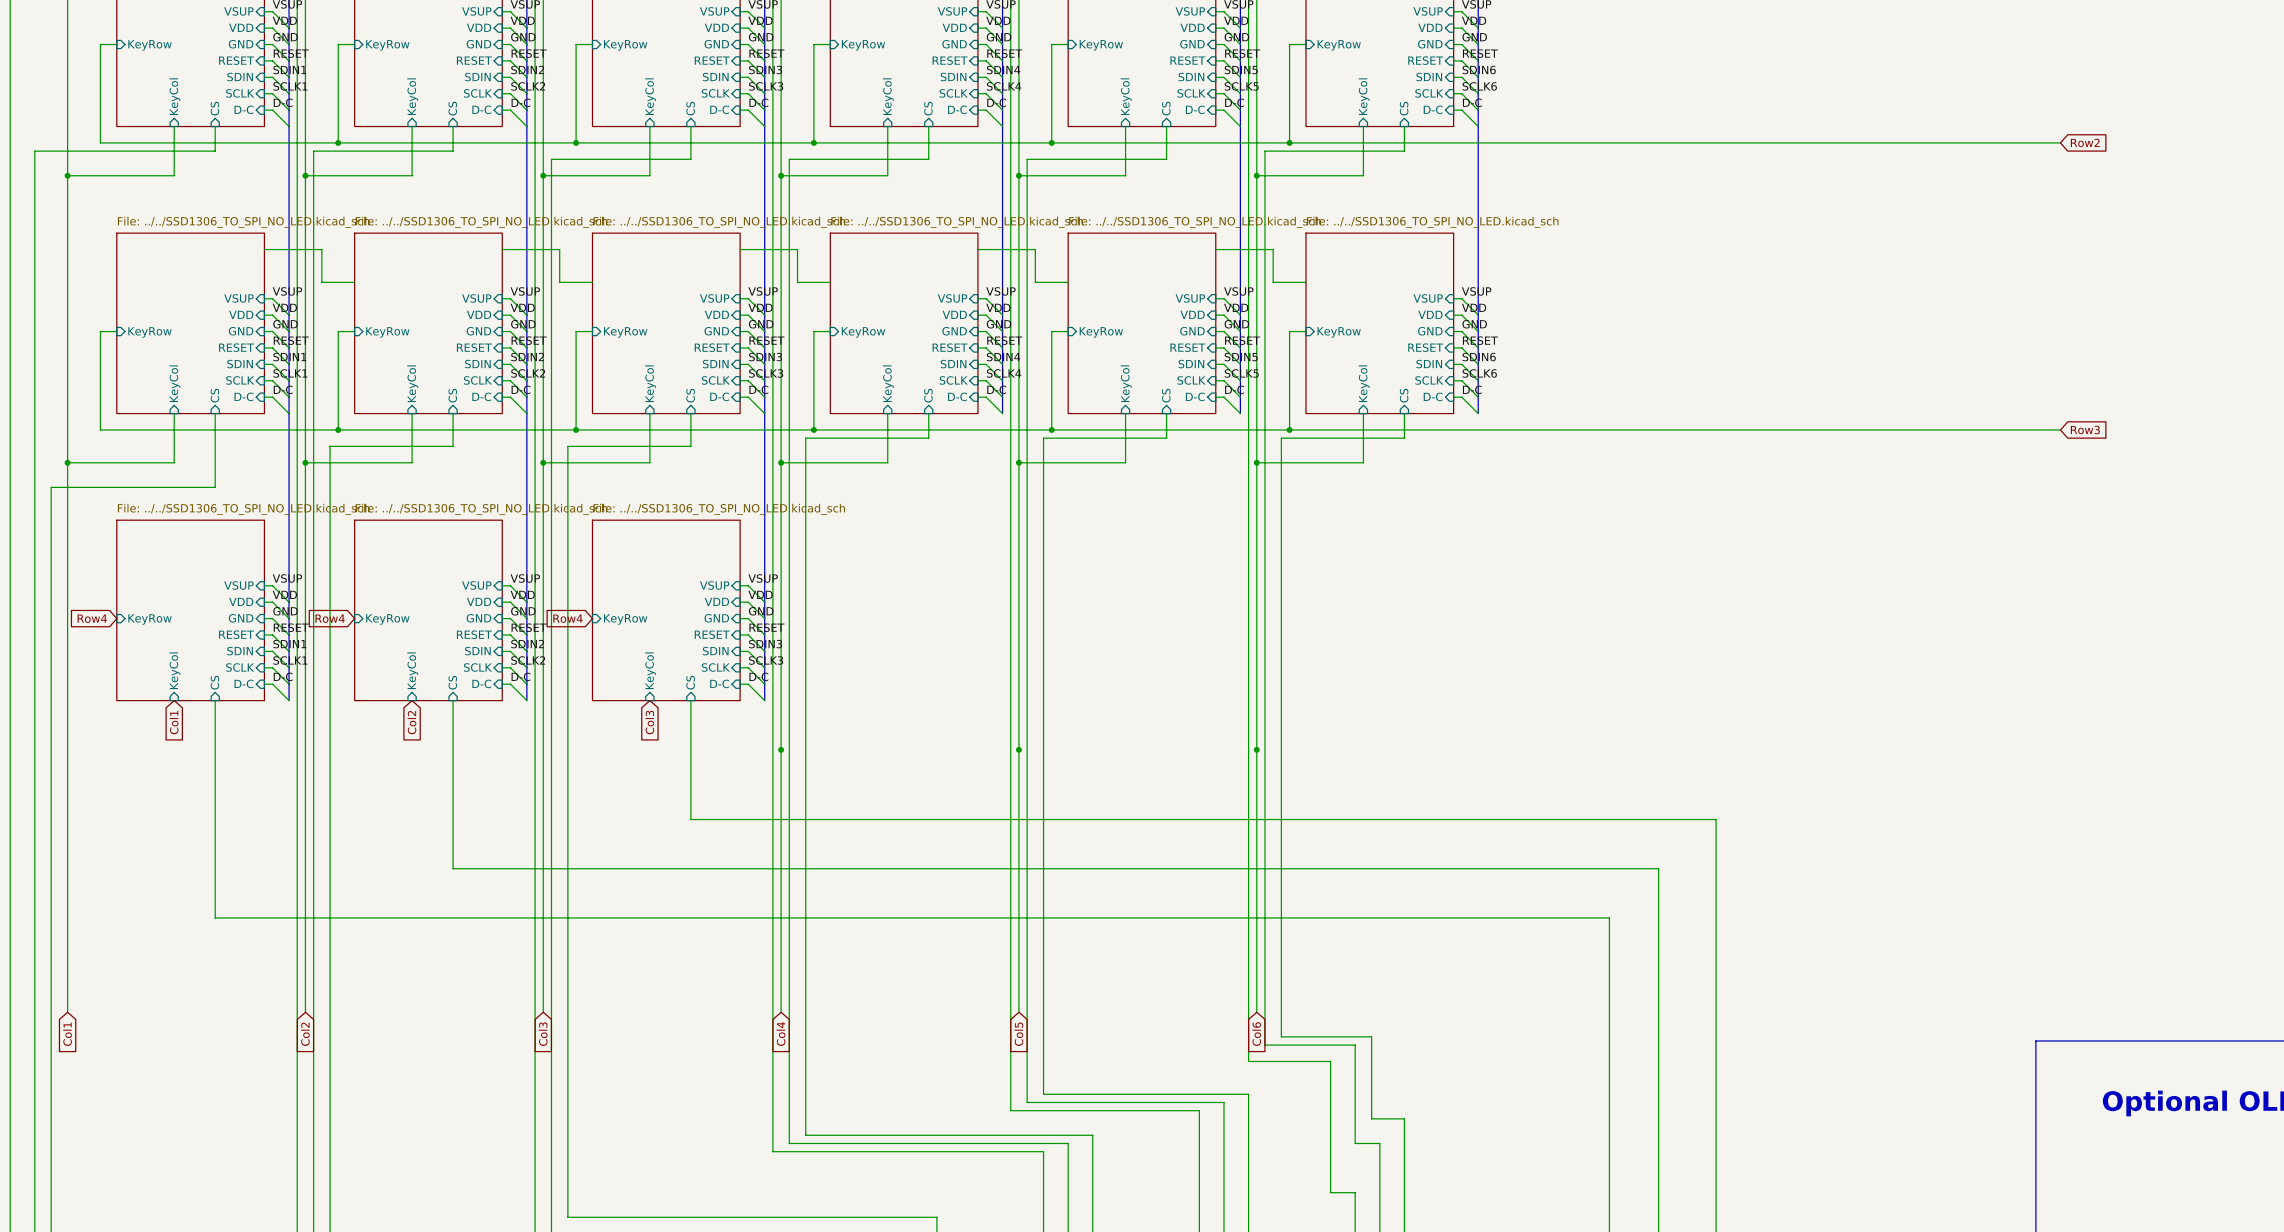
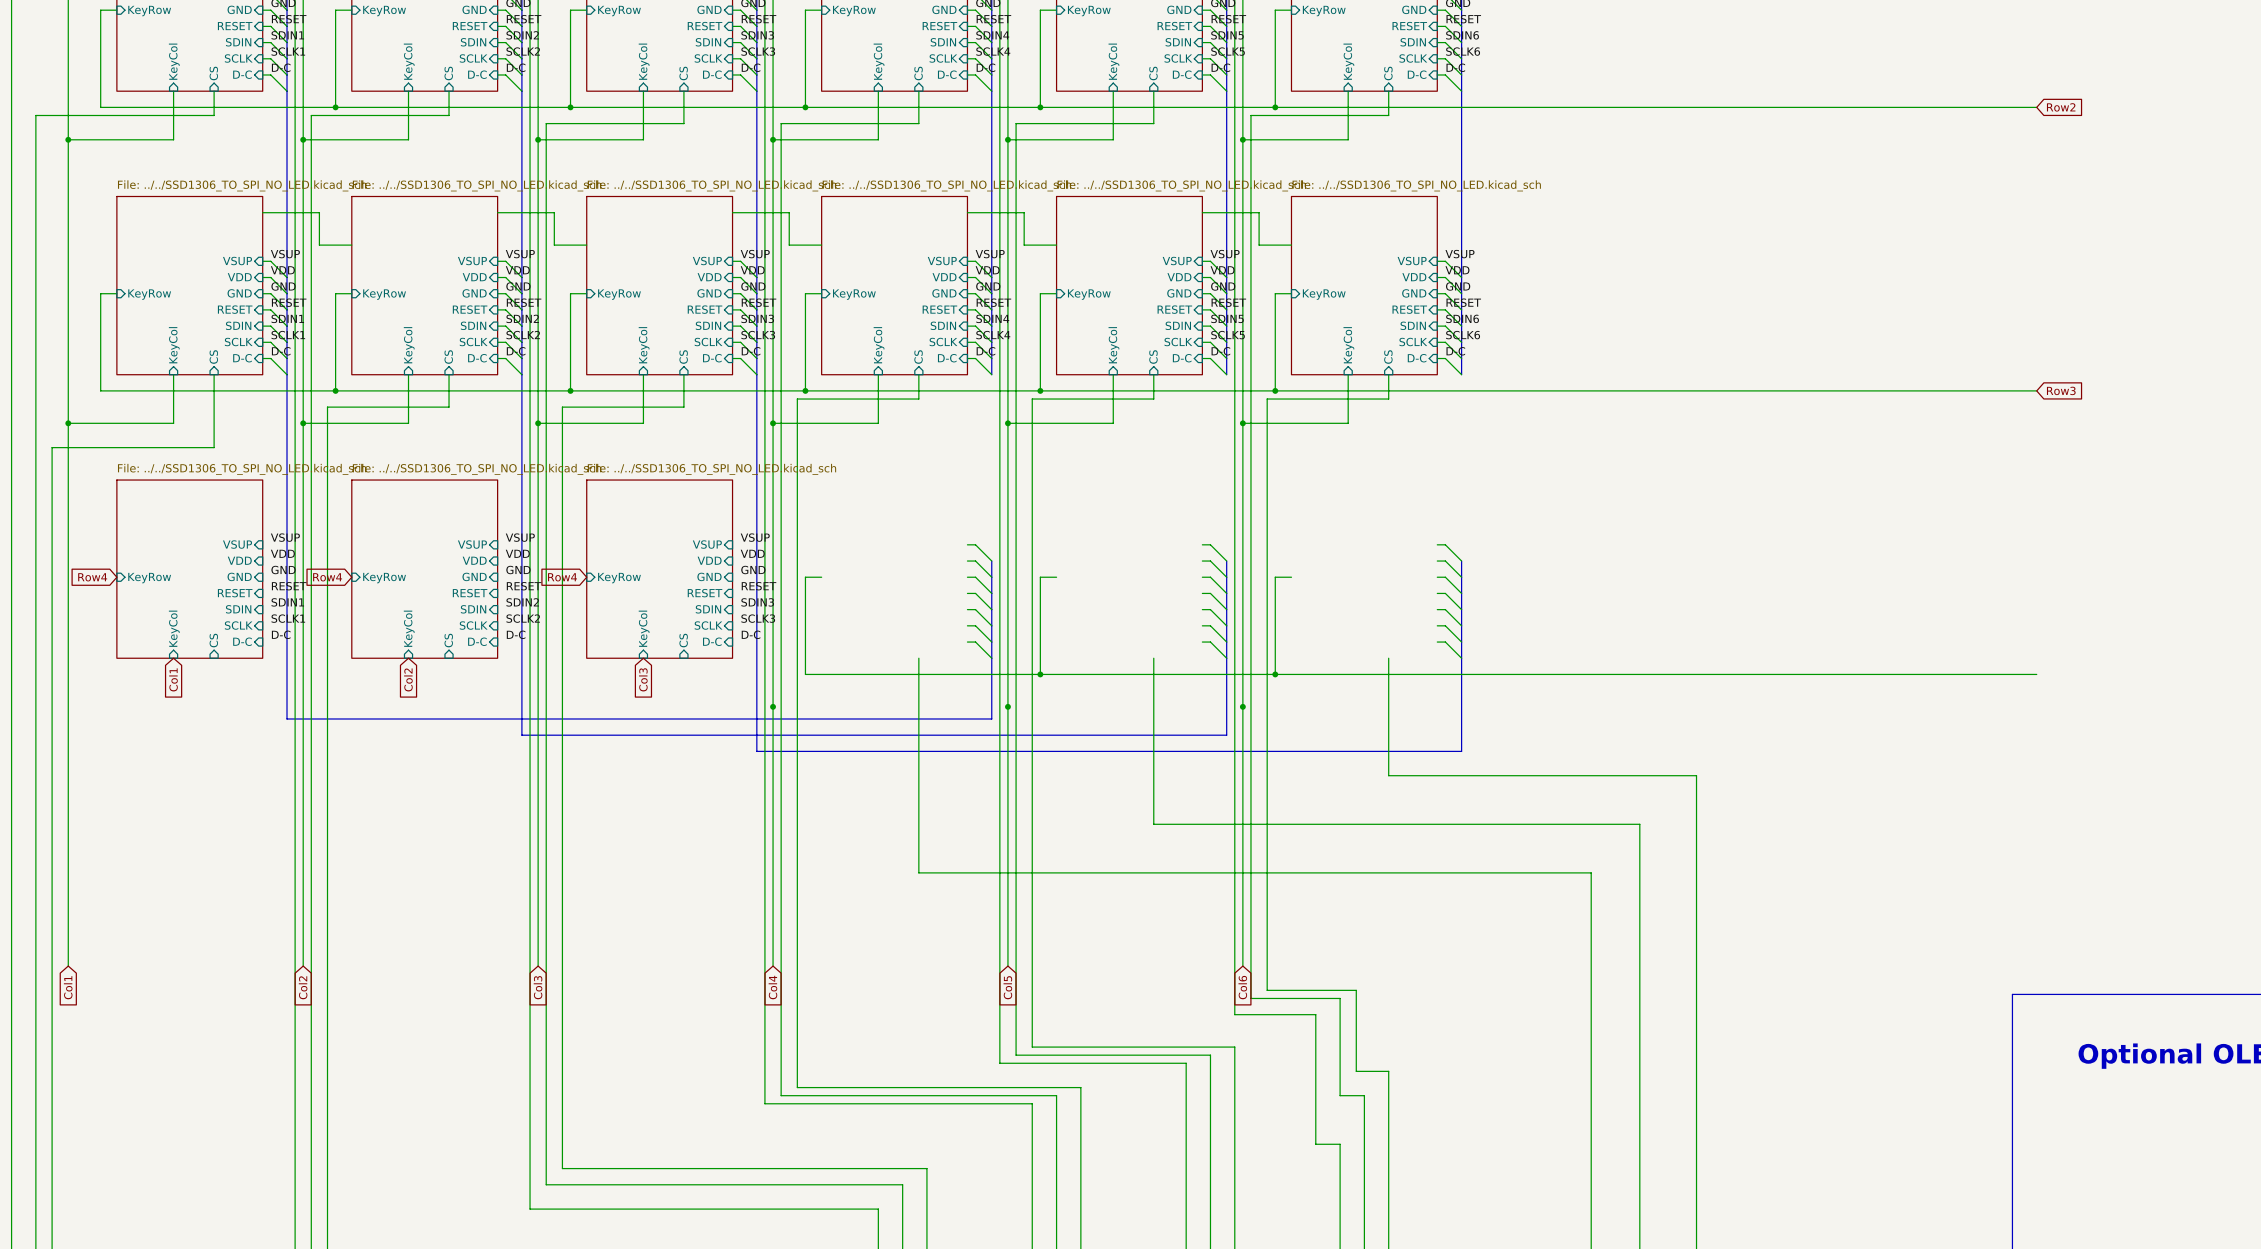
wire: (264, 585) (272, 585) (289, 602) -> none
wire: (502, 585) (510, 585) (526, 602) -> none
wire: (740, 585) (748, 585) (764, 602) -> none
wire: none -> (967, 544) (975, 544) (991, 561)
wire: none -> (1202, 544) (1210, 544) (1226, 561)
wire: none -> (1437, 544) (1445, 544) (1461, 561)
wire: (264, 602) (272, 602) (289, 618) -> none
wire: (502, 602) (510, 602) (526, 618) -> none
wire: (740, 602) (748, 602) (764, 618) -> none
wire: none -> (967, 561) (975, 561) (991, 577)
bus: none -> (991, 561) (991, 718) (287, 718) (287, 658)
wire: none -> (1202, 561) (1210, 561) (1226, 577)
bus: none -> (1226, 561) (1226, 735) (521, 735) (521, 658)
wire: none -> (1437, 561) (1445, 561) (1461, 577)
bus: none -> (1461, 561) (1461, 751) (756, 751) (756, 658)
wire: (264, 618) (272, 618) (289, 635) -> none
wire: (502, 618) (510, 618) (526, 635) -> none
wire: (740, 618) (748, 618) (764, 635) -> none
wire: none -> (821, 577) (805, 577) (805, 674) (2036, 674)
wire: none -> (967, 577) (975, 577) (991, 593)
wire: none -> (1056, 577) (1040, 577) (1040, 674)
wire: none -> (1202, 577) (1210, 577) (1226, 593)
wire: none -> (1291, 577) (1275, 577) (1275, 674)
wire: none -> (1437, 577) (1445, 577) (1461, 593)
wire: (264, 635) (272, 635) (289, 651) -> none
wire: (502, 635) (510, 635) (526, 651) -> none
wire: (740, 635) (748, 635) (764, 651) -> none
wire: none -> (967, 593) (975, 593) (991, 609)
wire: none -> (1202, 593) (1210, 593) (1226, 609)
wire: none -> (1437, 593) (1445, 593) (1461, 609)
wire: (264, 651) (272, 651) (289, 667) -> none
wire: (502, 651) (510, 651) (526, 667) -> none
wire: (740, 651) (748, 651) (764, 667) -> none
wire: none -> (967, 609) (975, 609) (991, 625)
wire: none -> (1202, 609) (1210, 609) (1226, 625)
wire: none -> (1437, 609) (1445, 609) (1461, 625)
wire: (264, 667) (272, 667) (289, 684) -> none
wire: (502, 667) (510, 667) (526, 684) -> none
wire: (740, 667) (748, 667) (764, 684) -> none
wire: none -> (967, 625) (975, 625) (991, 642)
wire: none -> (1202, 625) (1210, 625) (1226, 642)
wire: none -> (1437, 625) (1445, 625) (1461, 642)
wire: (264, 684) (272, 684) (289, 700) -> none
wire: (502, 684) (510, 684) (526, 700) -> none
wire: (740, 684) (748, 684) (764, 700) -> none
wire: none -> (967, 642) (975, 642) (991, 658)
wire: none -> (1202, 642) (1210, 642) (1226, 658)
wire: none -> (1437, 642) (1445, 642) (1461, 658)
wire: (215, 700) (215, 917) (928, 917) -> (918, 658) (918, 872)
wire: (453, 700) (453, 868) (1166, 868) -> (1153, 658) (1153, 824)
wire: (690, 700) (690, 819) (1404, 819) -> (1388, 658) (1388, 775)
junction: none -> (1040, 674)
junction: none -> (1275, 674)

